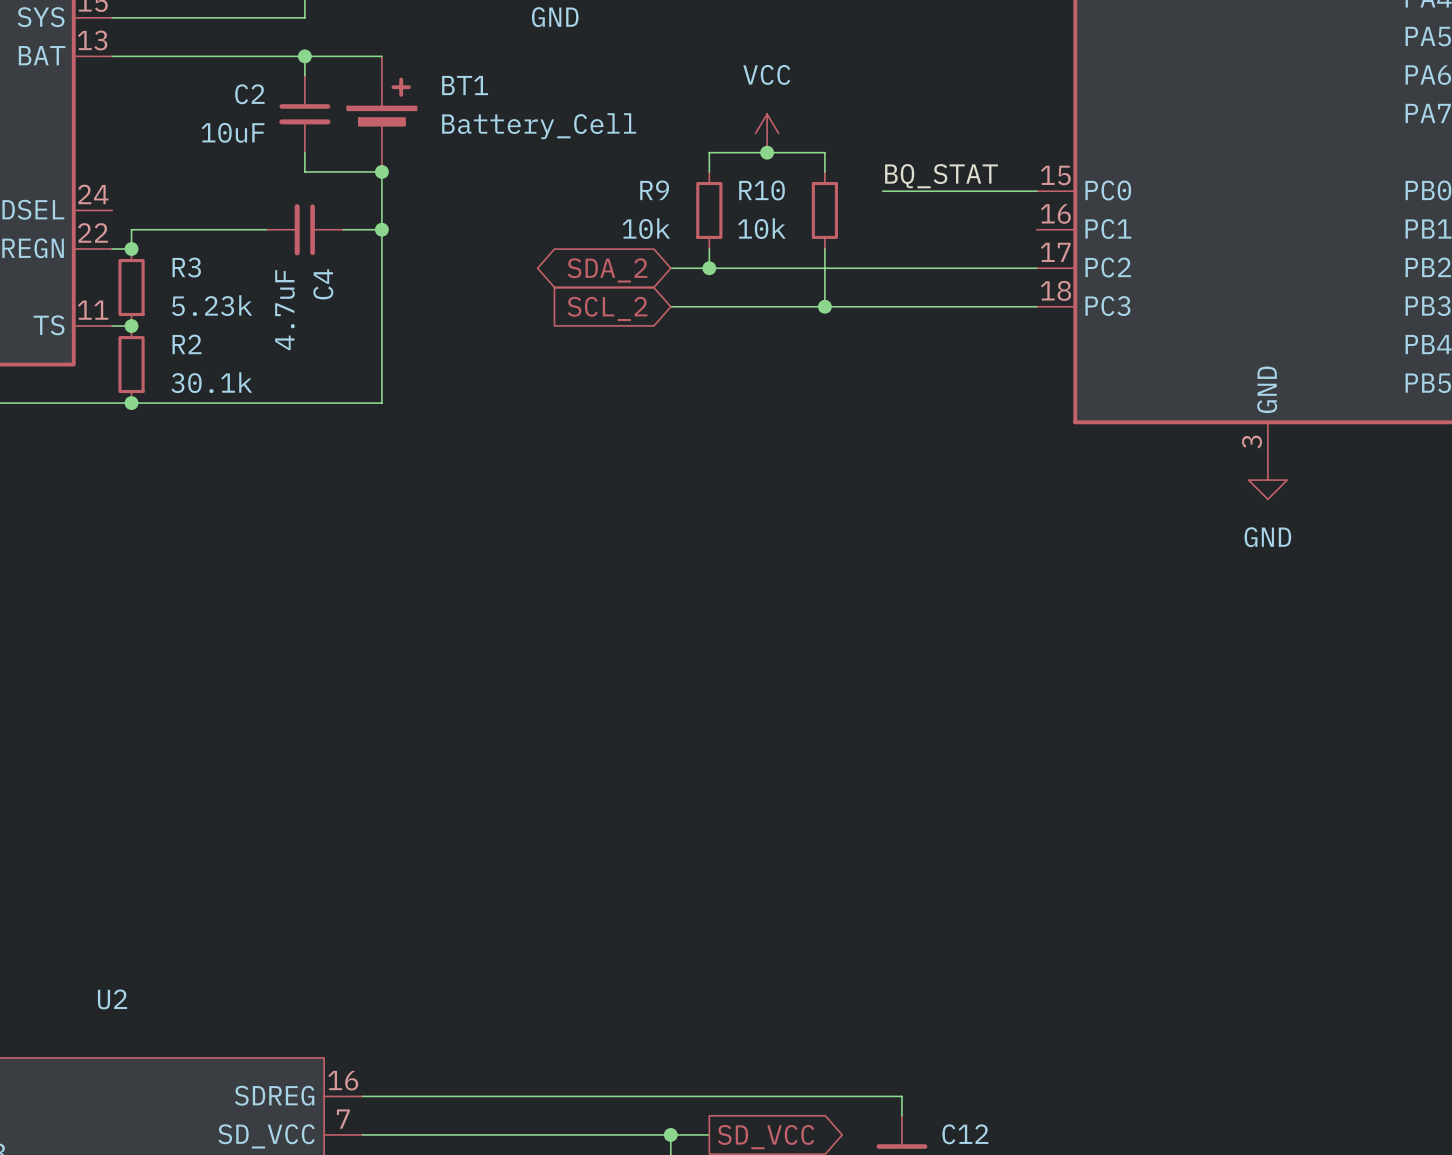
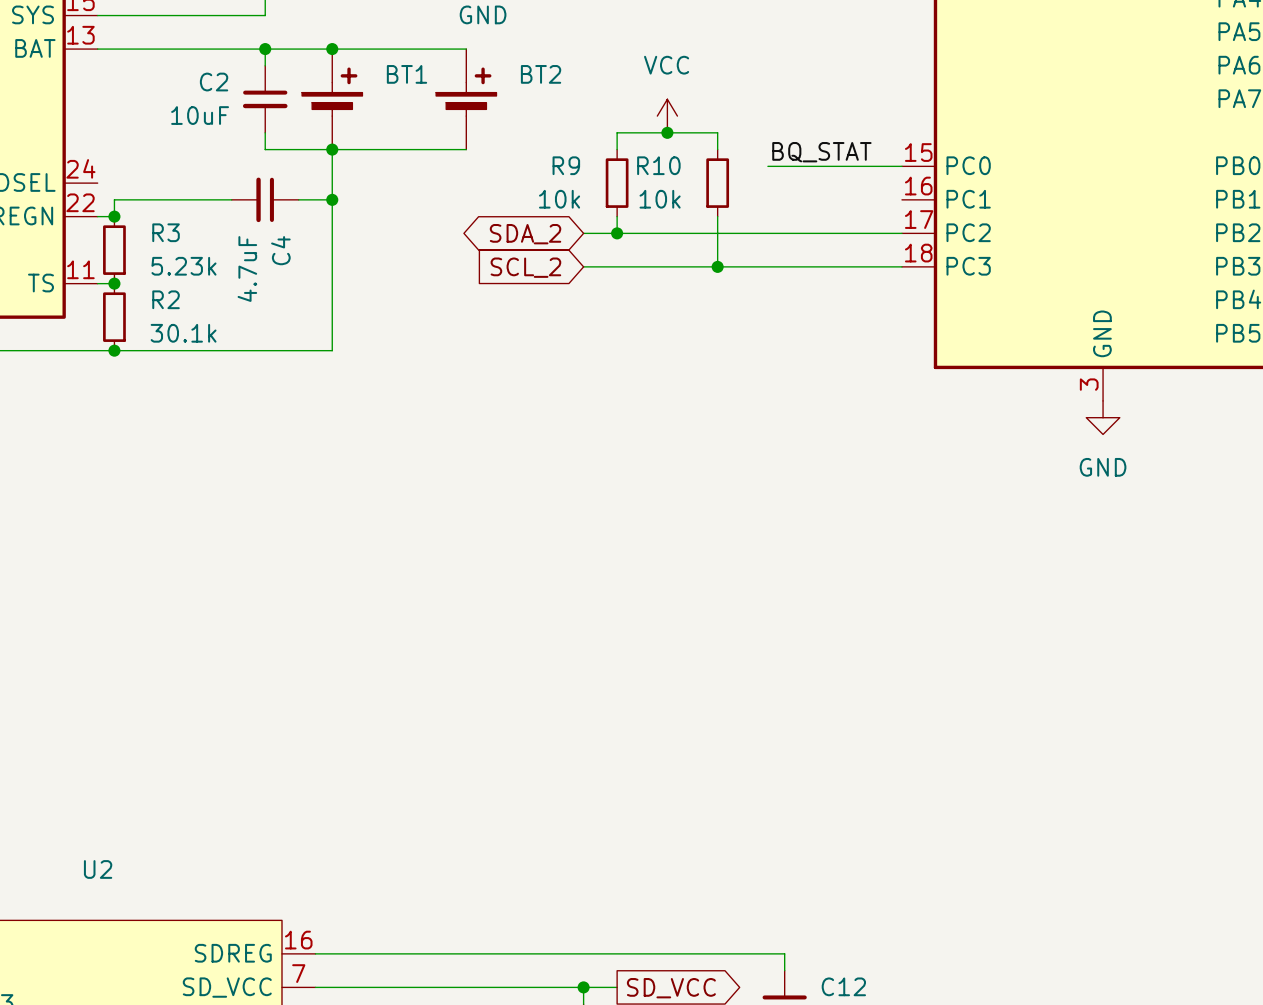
wire: none -> (332, 49) (466, 49)
junction: none -> (332, 49)
BT2: none -> (466, 99)
BT1 value: Battery_Cell (539, 126) -> none
wire: none -> (332, 149) (466, 149)

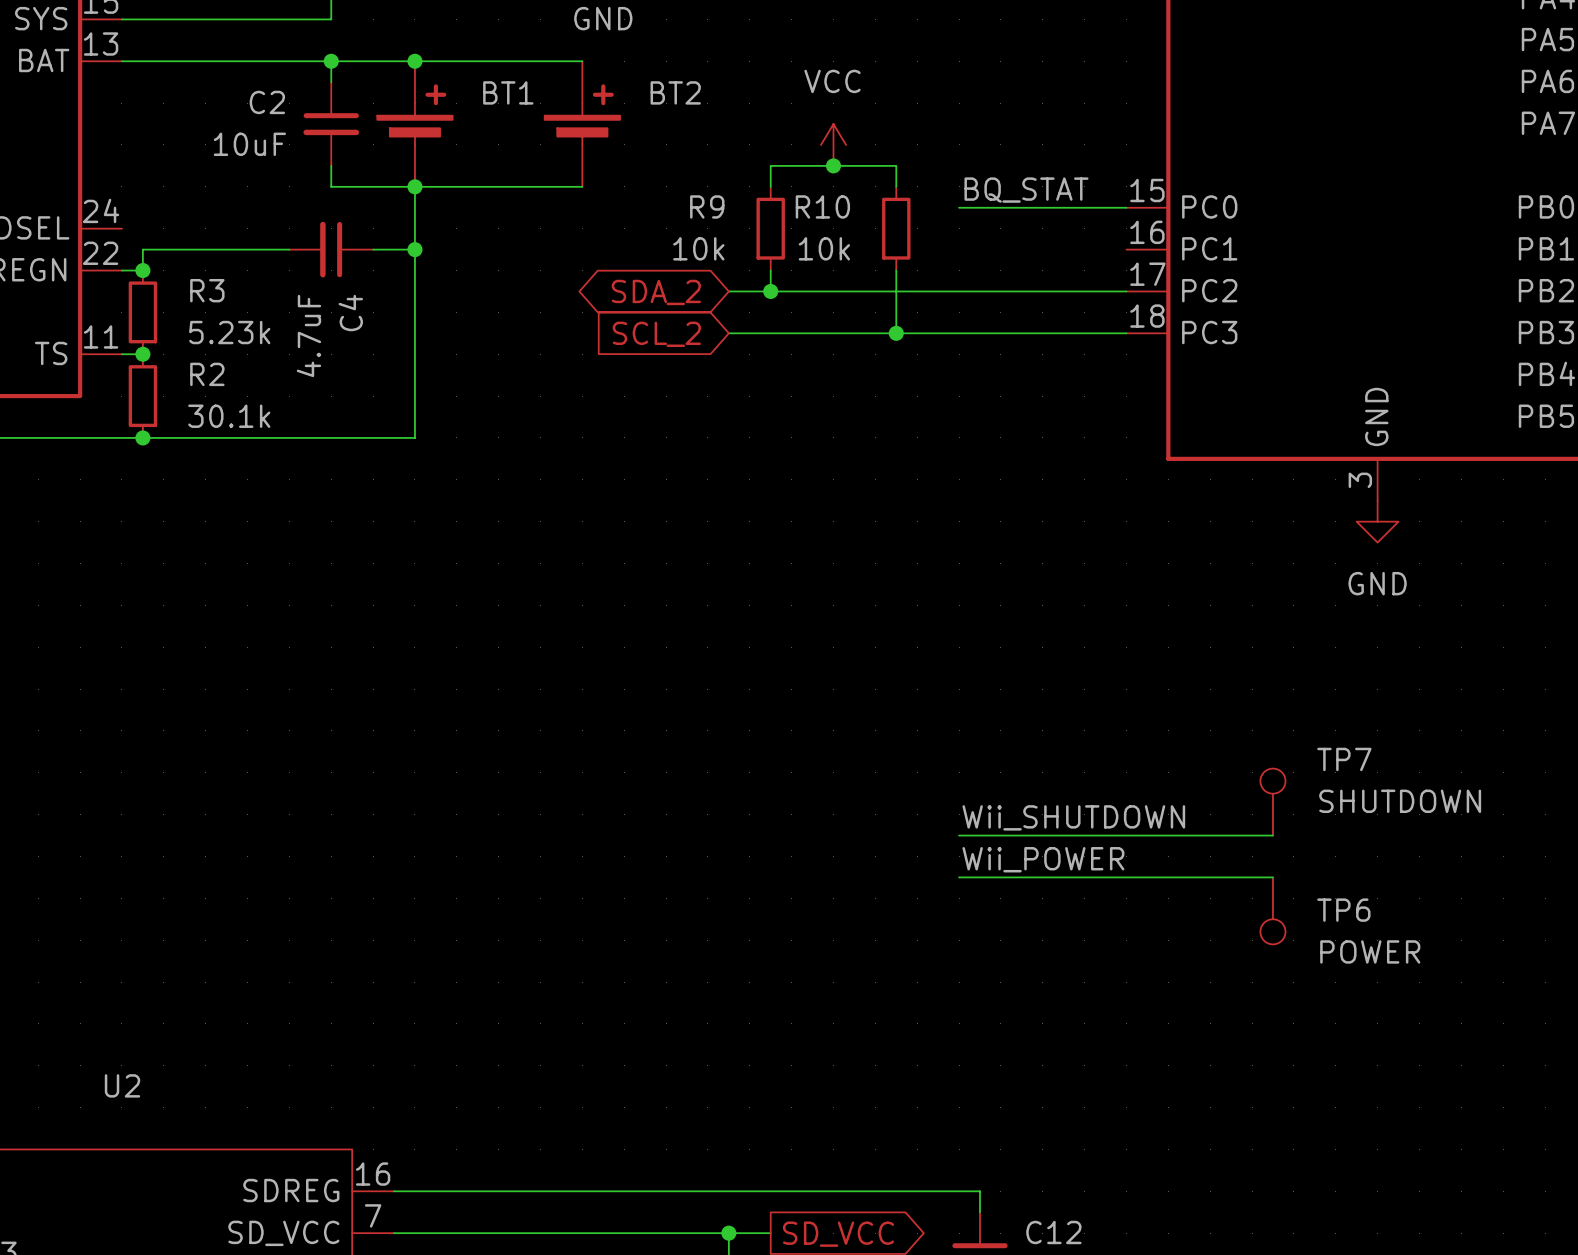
TP7: none -> SHUTDOWN (1272, 802)
label: none -> Wii_SHUTDOWN (1073, 817)
wire: none -> (959, 835) (1272, 835)
label: none -> Wii_POWER (1043, 859)
wire: none -> (959, 877) (1272, 877)
TP6: none -> POWER (1272, 910)

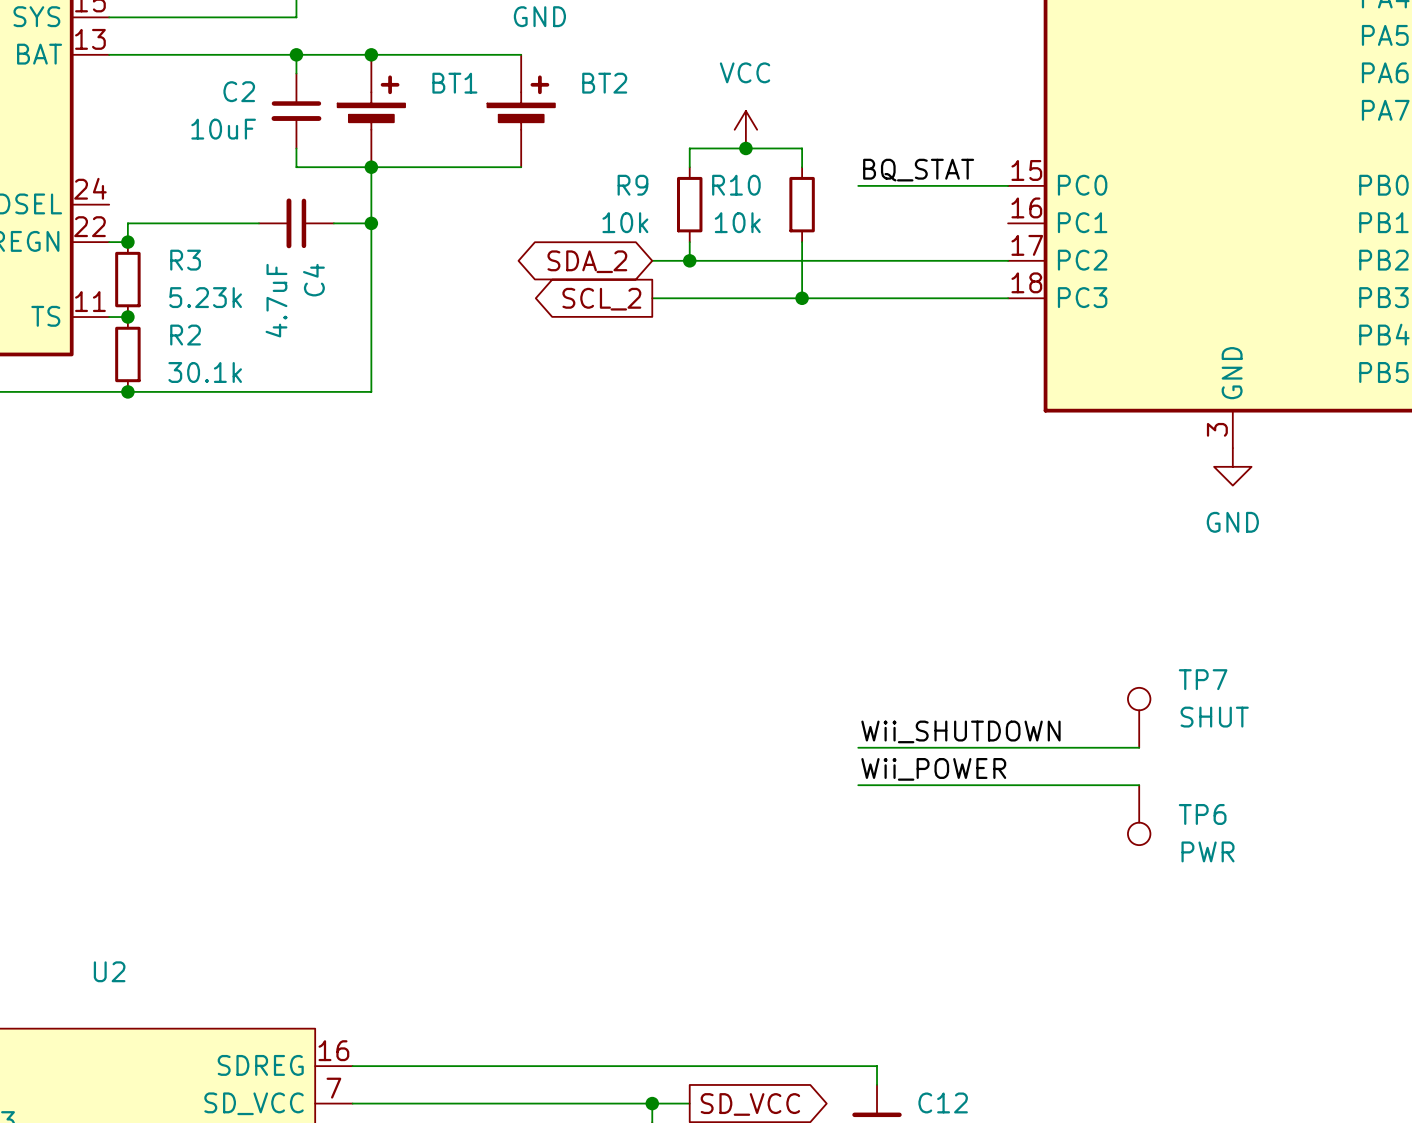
global label shape: input (656, 334) -> output (601, 299)
TP7 value: SHUTDOWN (1400, 801) -> SHUT (1214, 717)
TP6 value: POWER (1370, 951) -> PWR (1208, 851)

